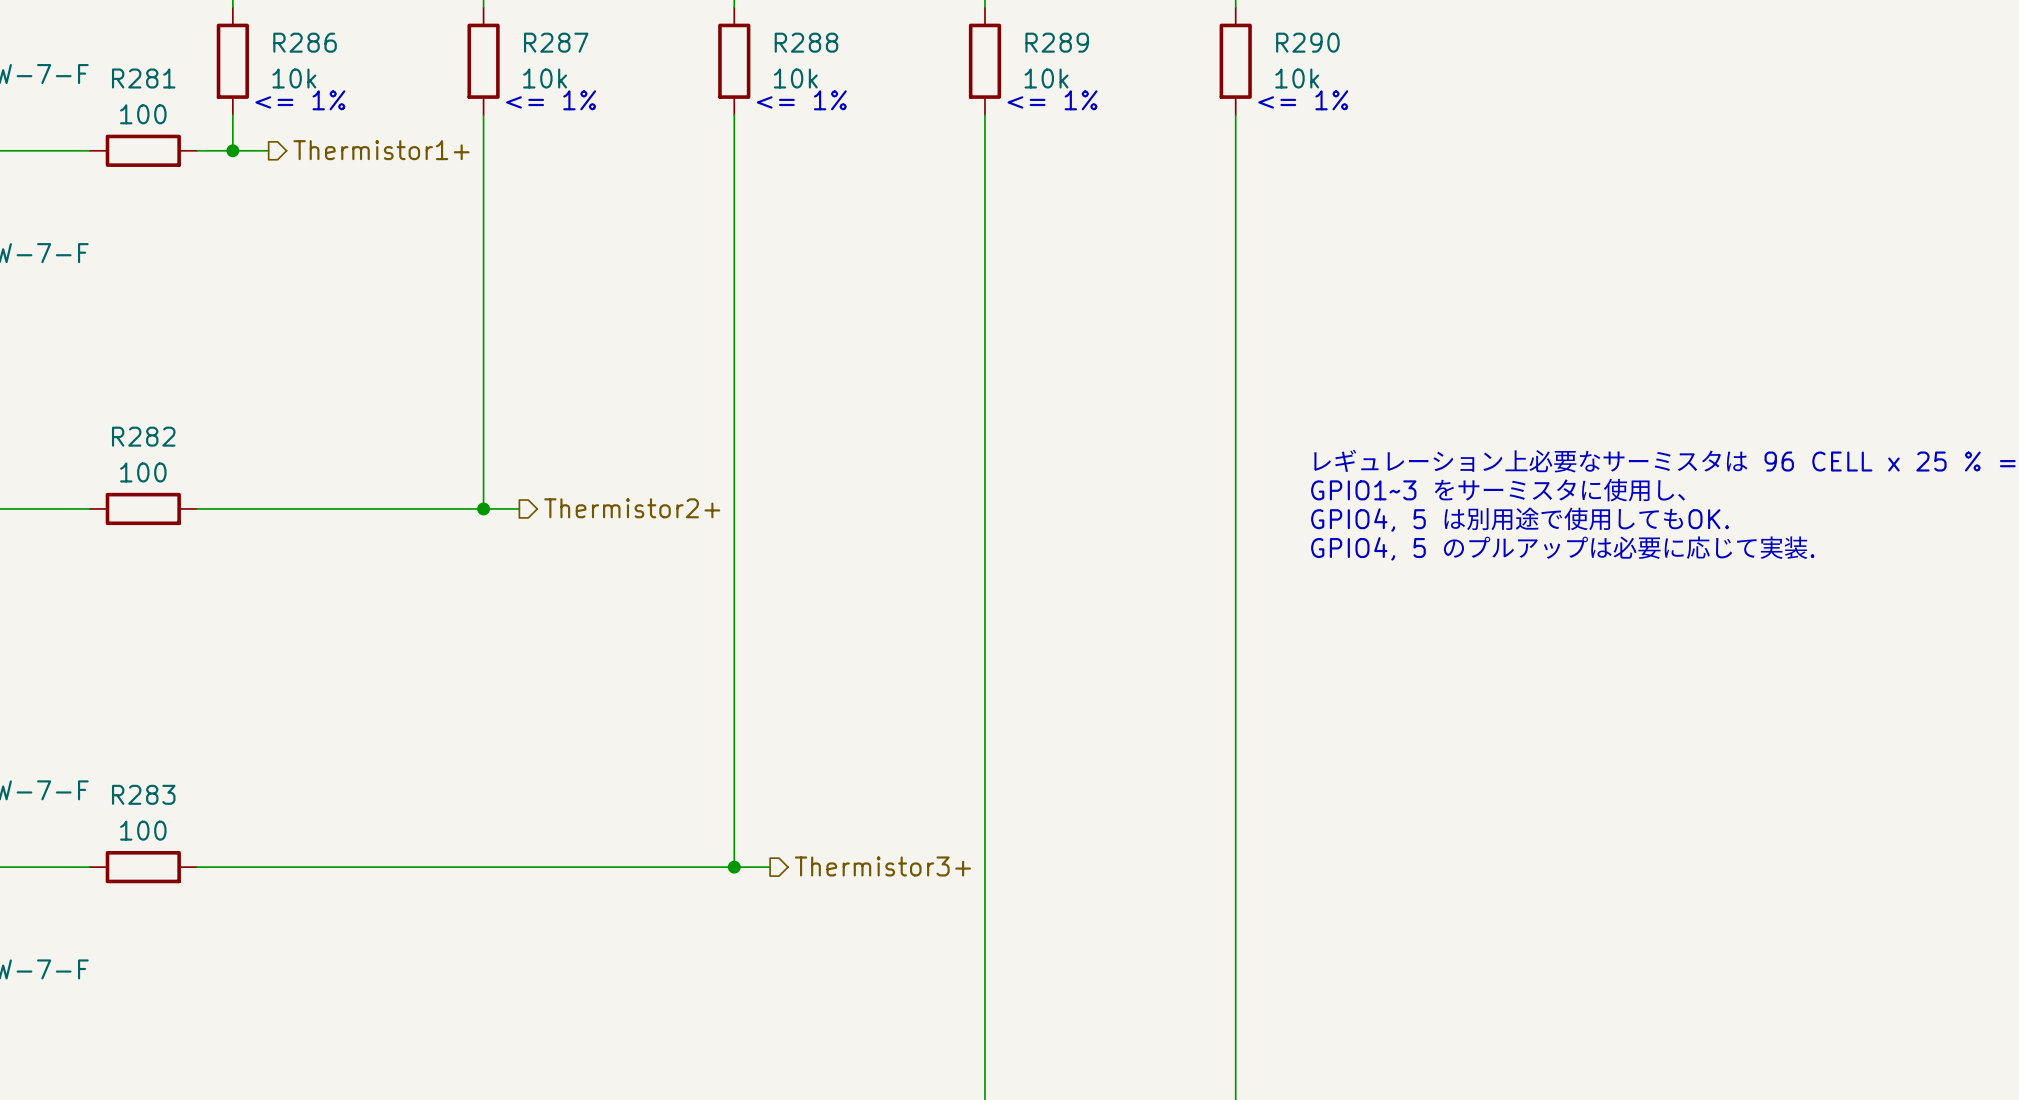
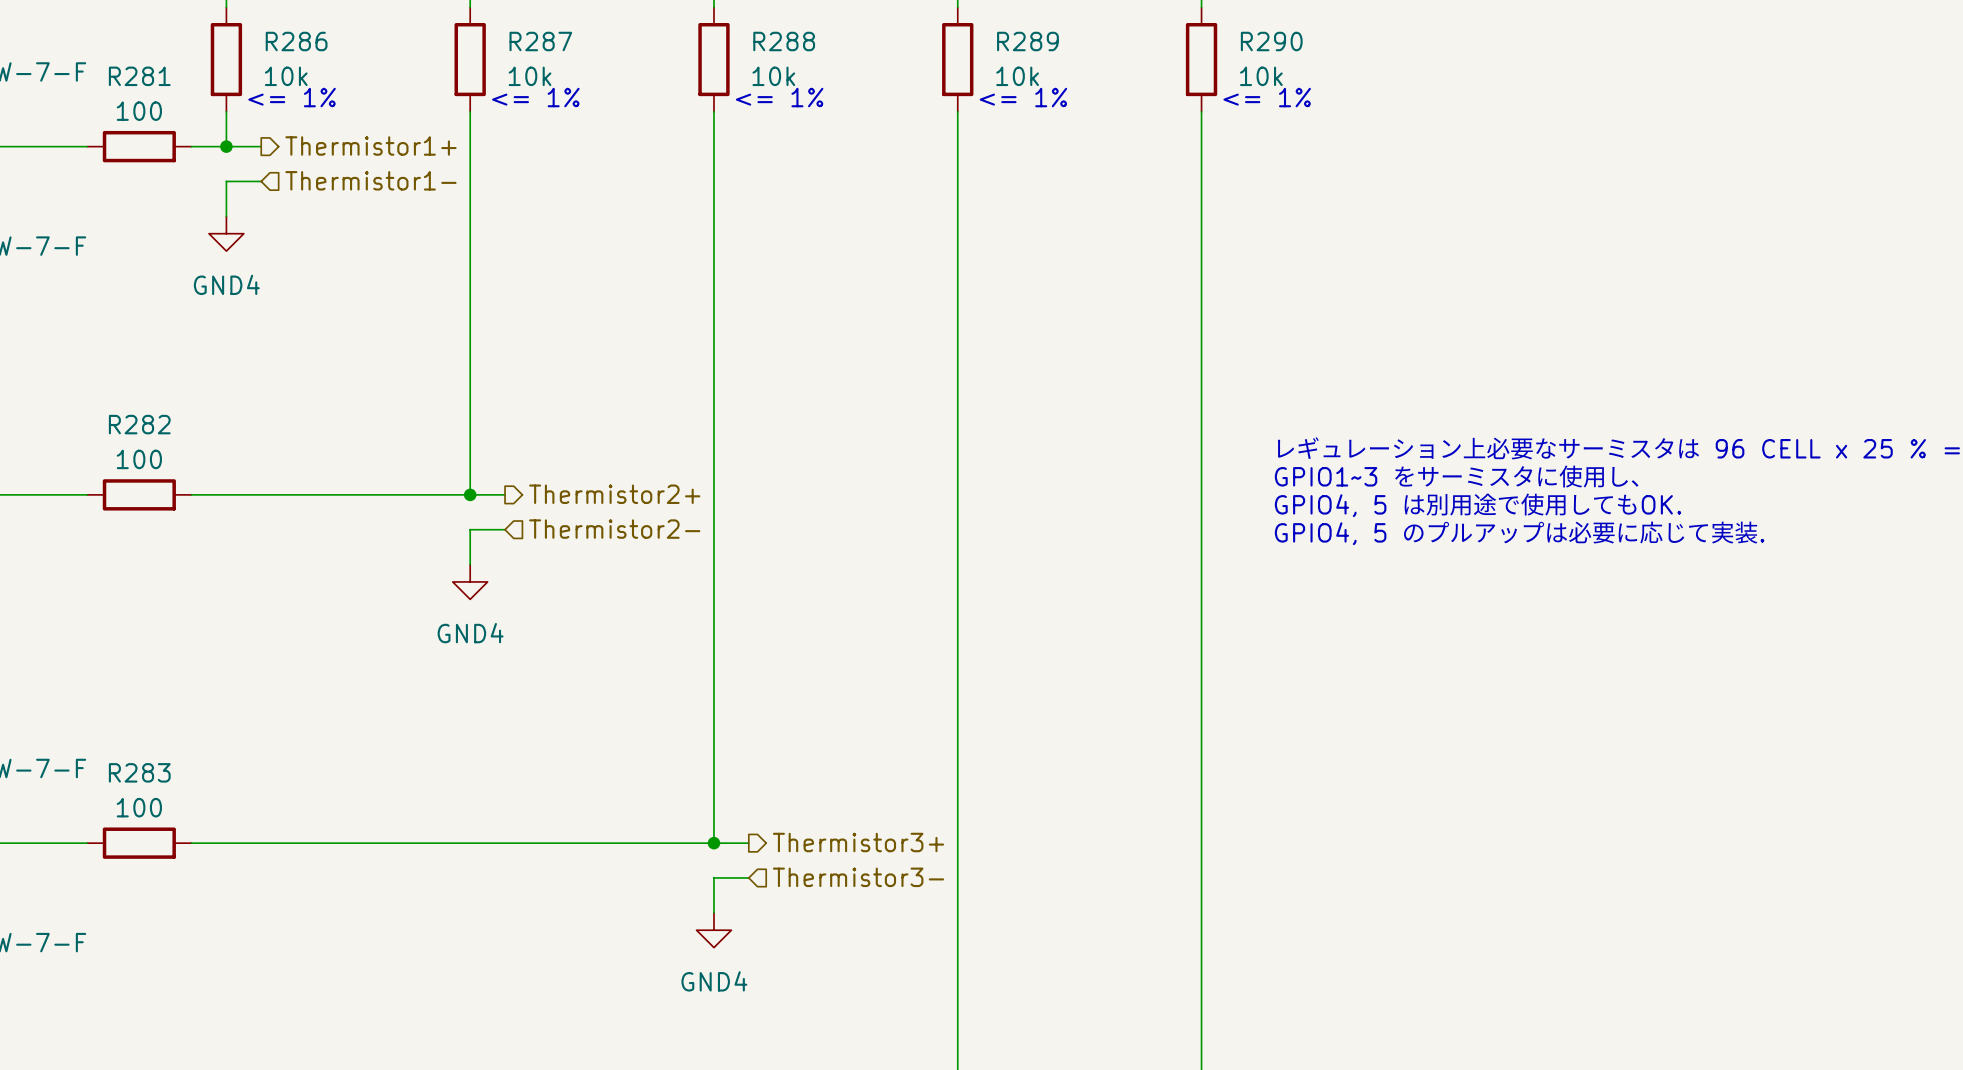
hierarchical label: none -> Thermistor1- (370, 180)
wire: none -> (261, 181) (226, 181) (226, 216)
power symbol: none -> GND4 (226, 233)
wire: none -> (505, 529) (470, 529) (470, 564)
hierarchical label: none -> Thermistor2- (614, 529)
power symbol: none -> GND4 (470, 581)
wire: none -> (748, 877) (713, 877) (713, 912)
hierarchical label: none -> Thermistor3- (858, 877)
power symbol: none -> GND4 (713, 930)

